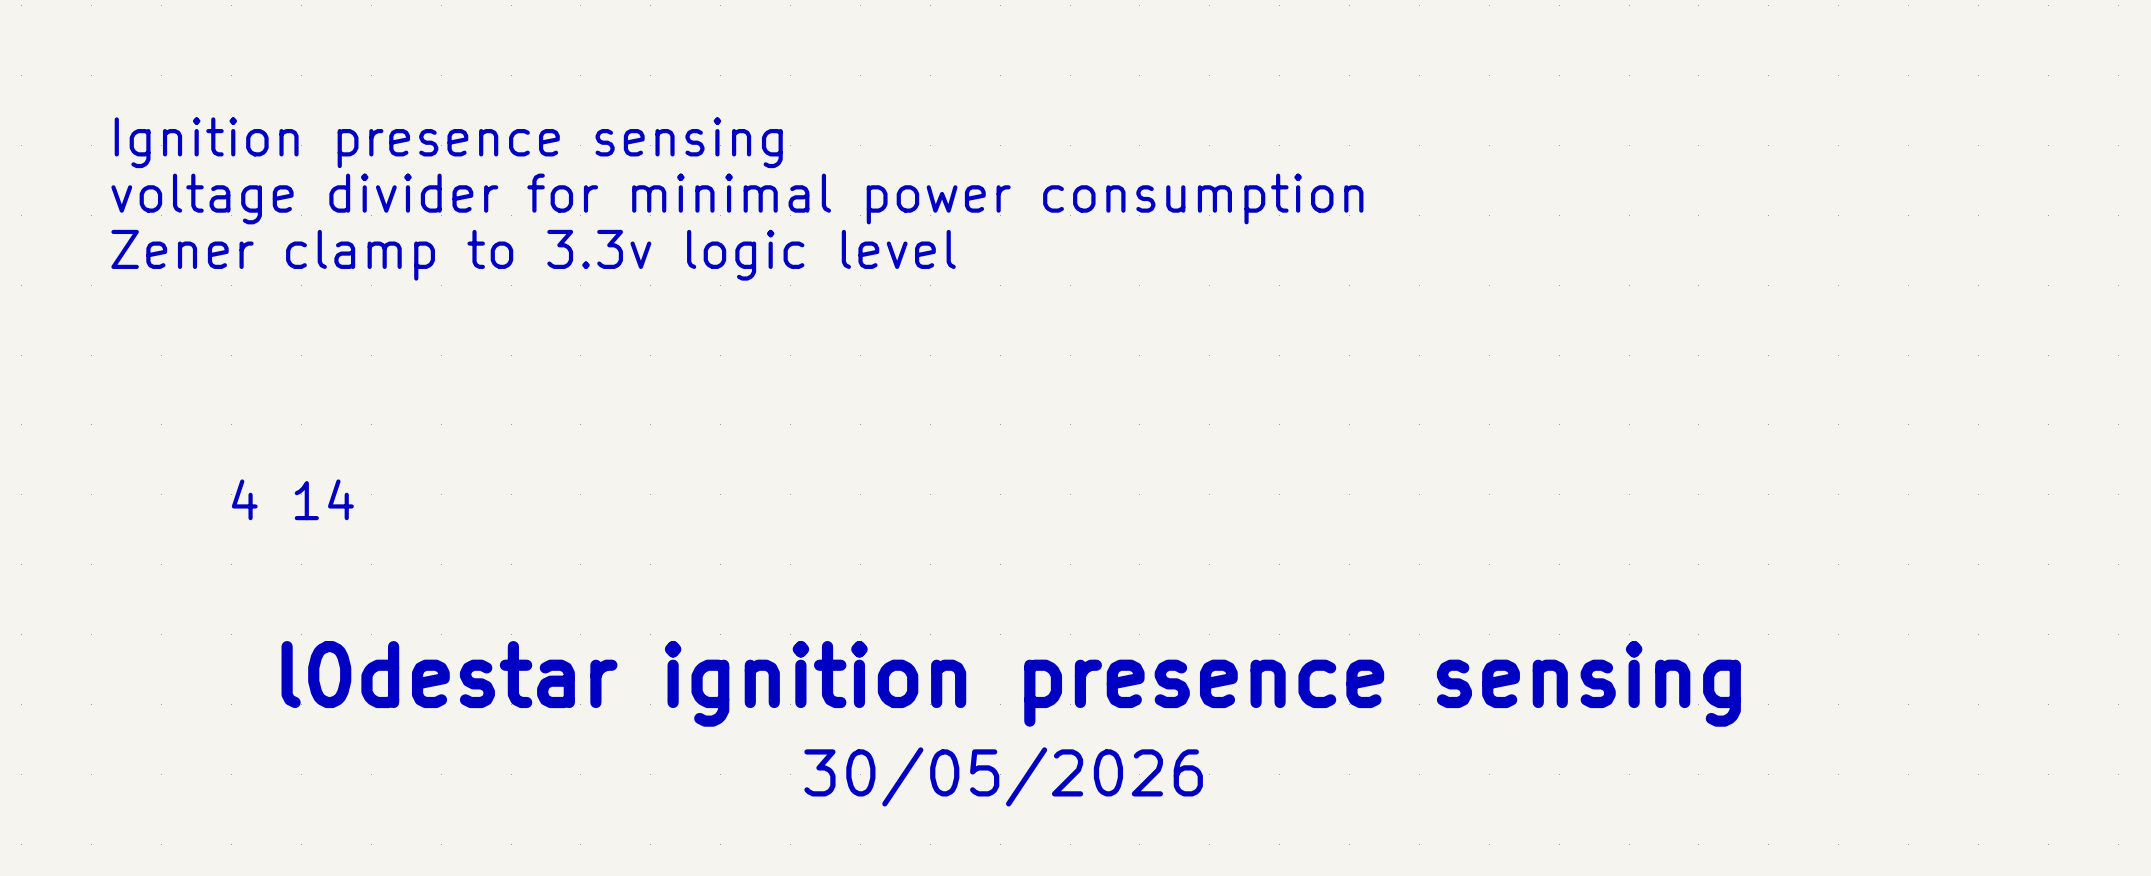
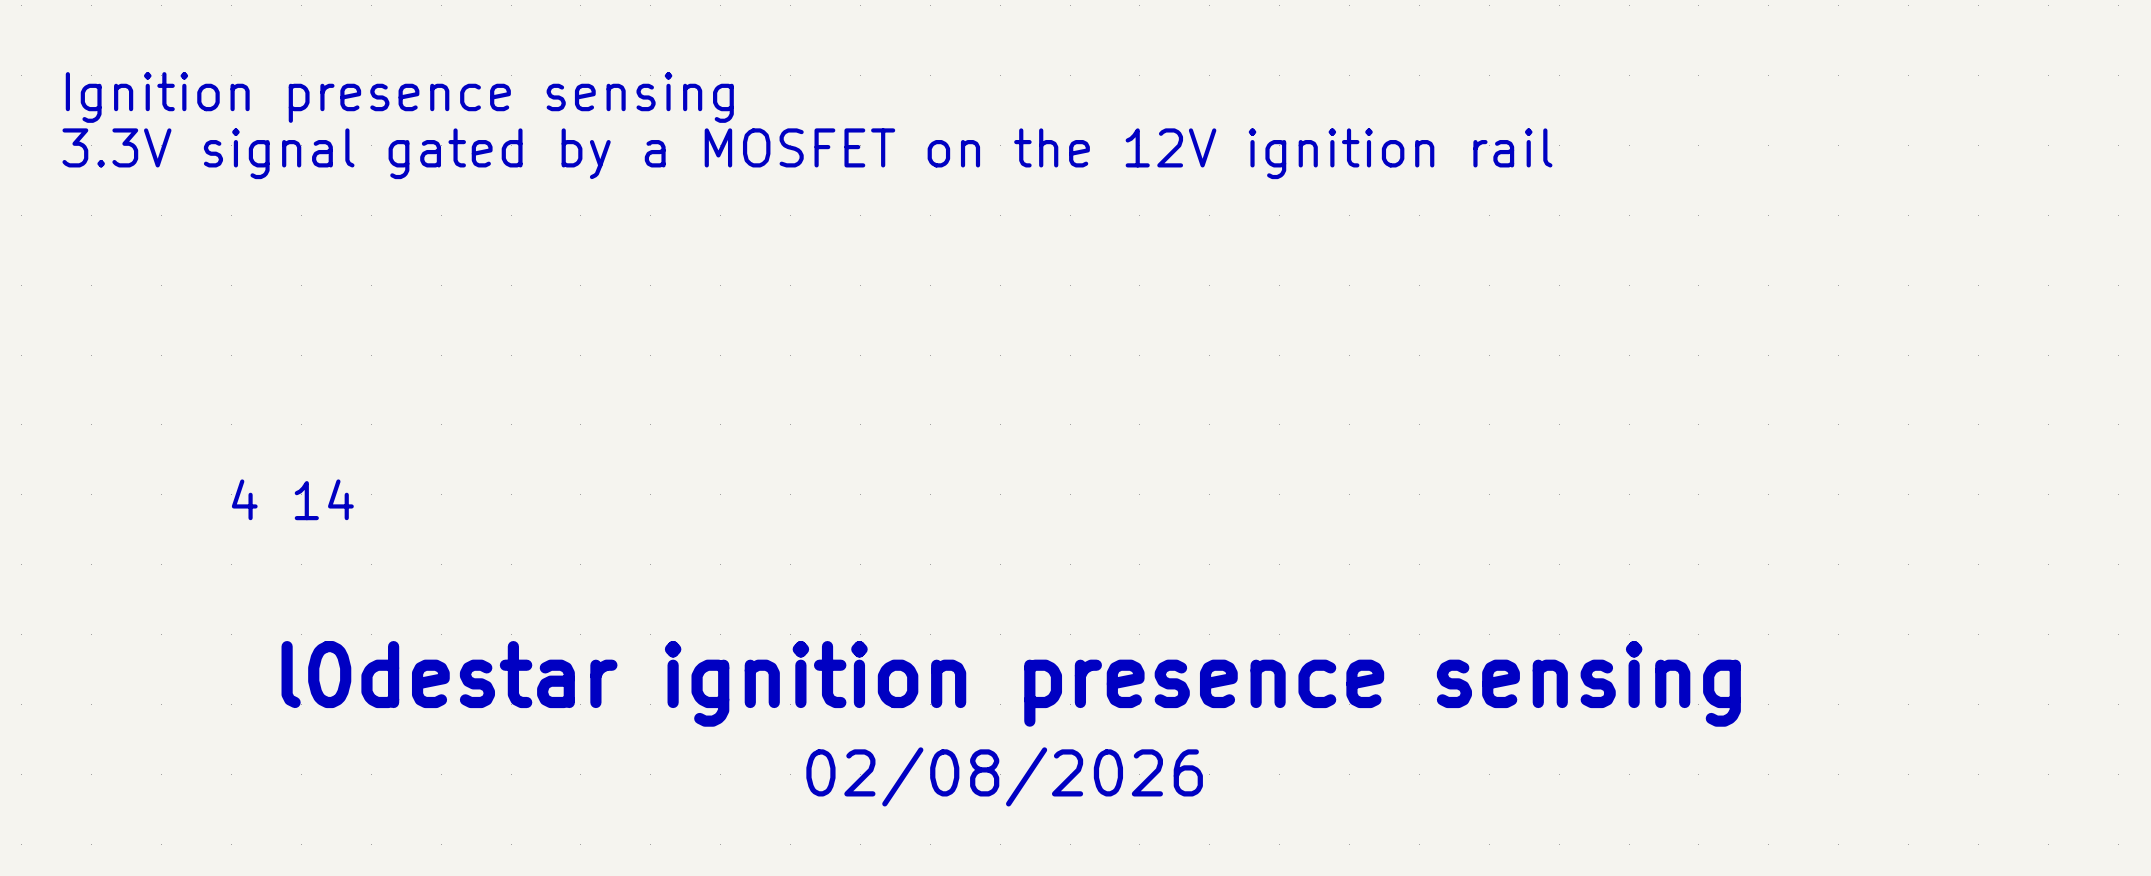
text position: Ignition presence sensing (448, 142) -> Ignition presence sensing (399, 97)
text: none -> 3.3V signal gated by a MOSFET on the 12V ignition rail (807, 153)
text: voltage divider for minimal power consumption (737, 198) -> none
text: Zener clamp to 3.3v logic level (533, 255) -> none
text: 30/05/2026 (1003, 776) -> 02/08/2026 (1004, 776)

